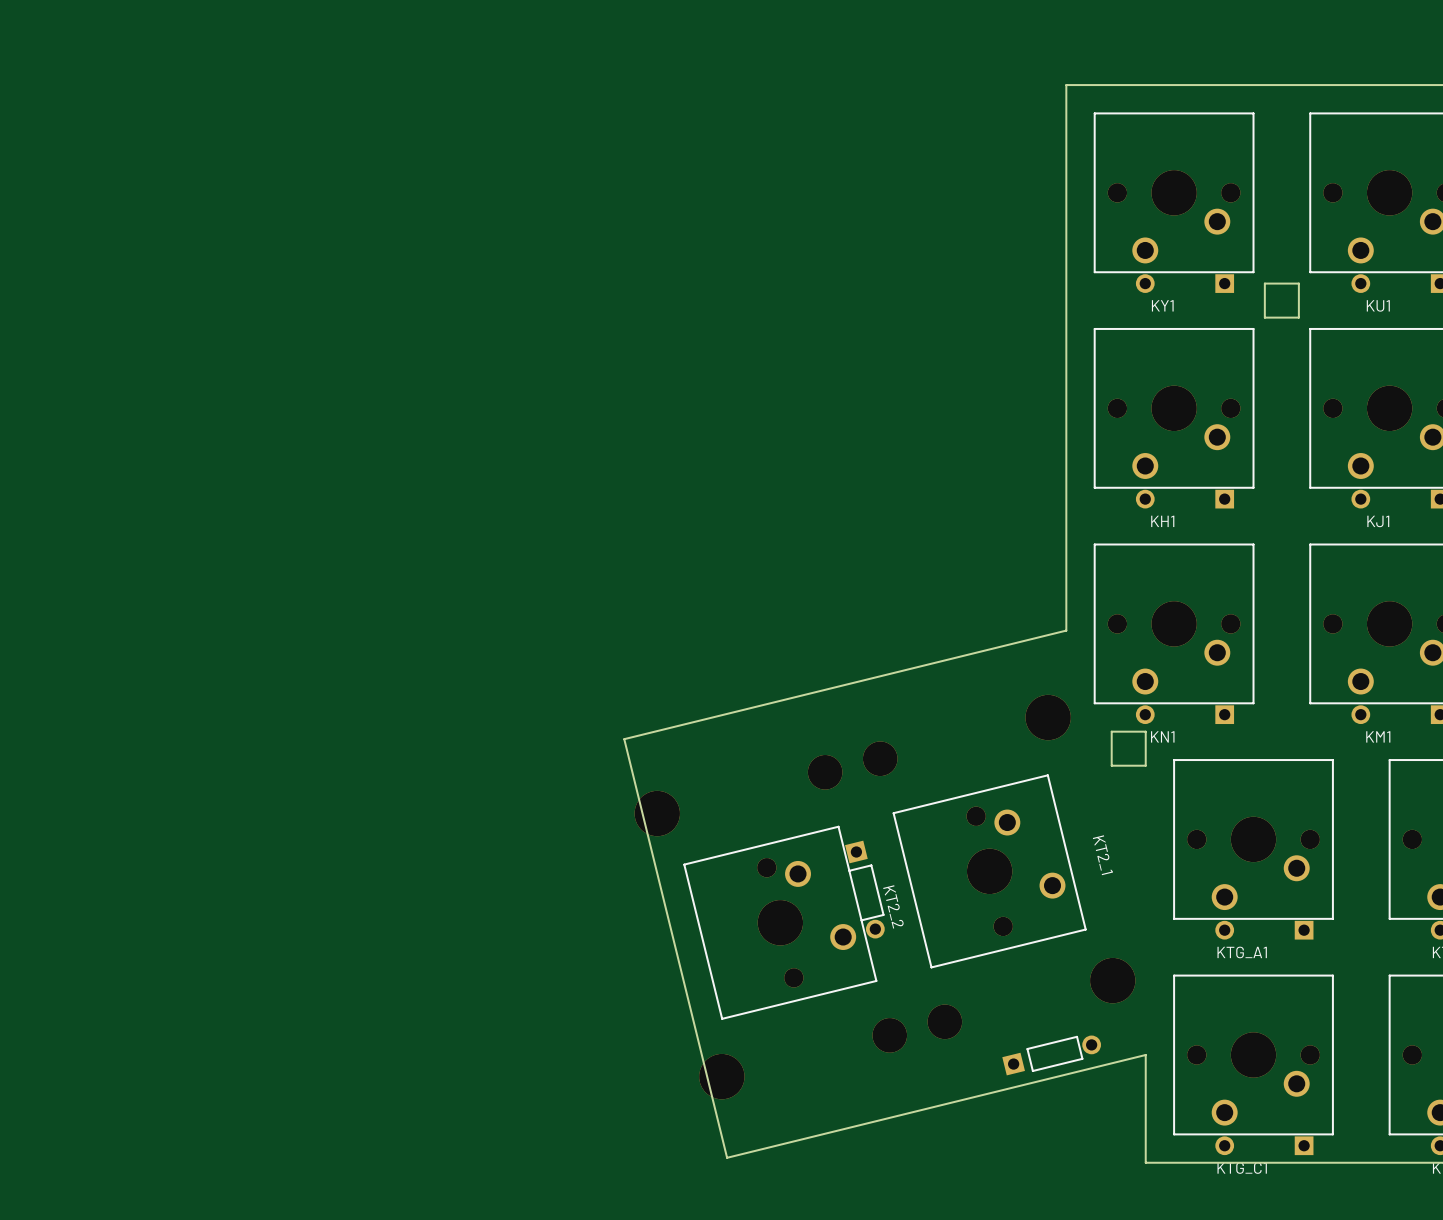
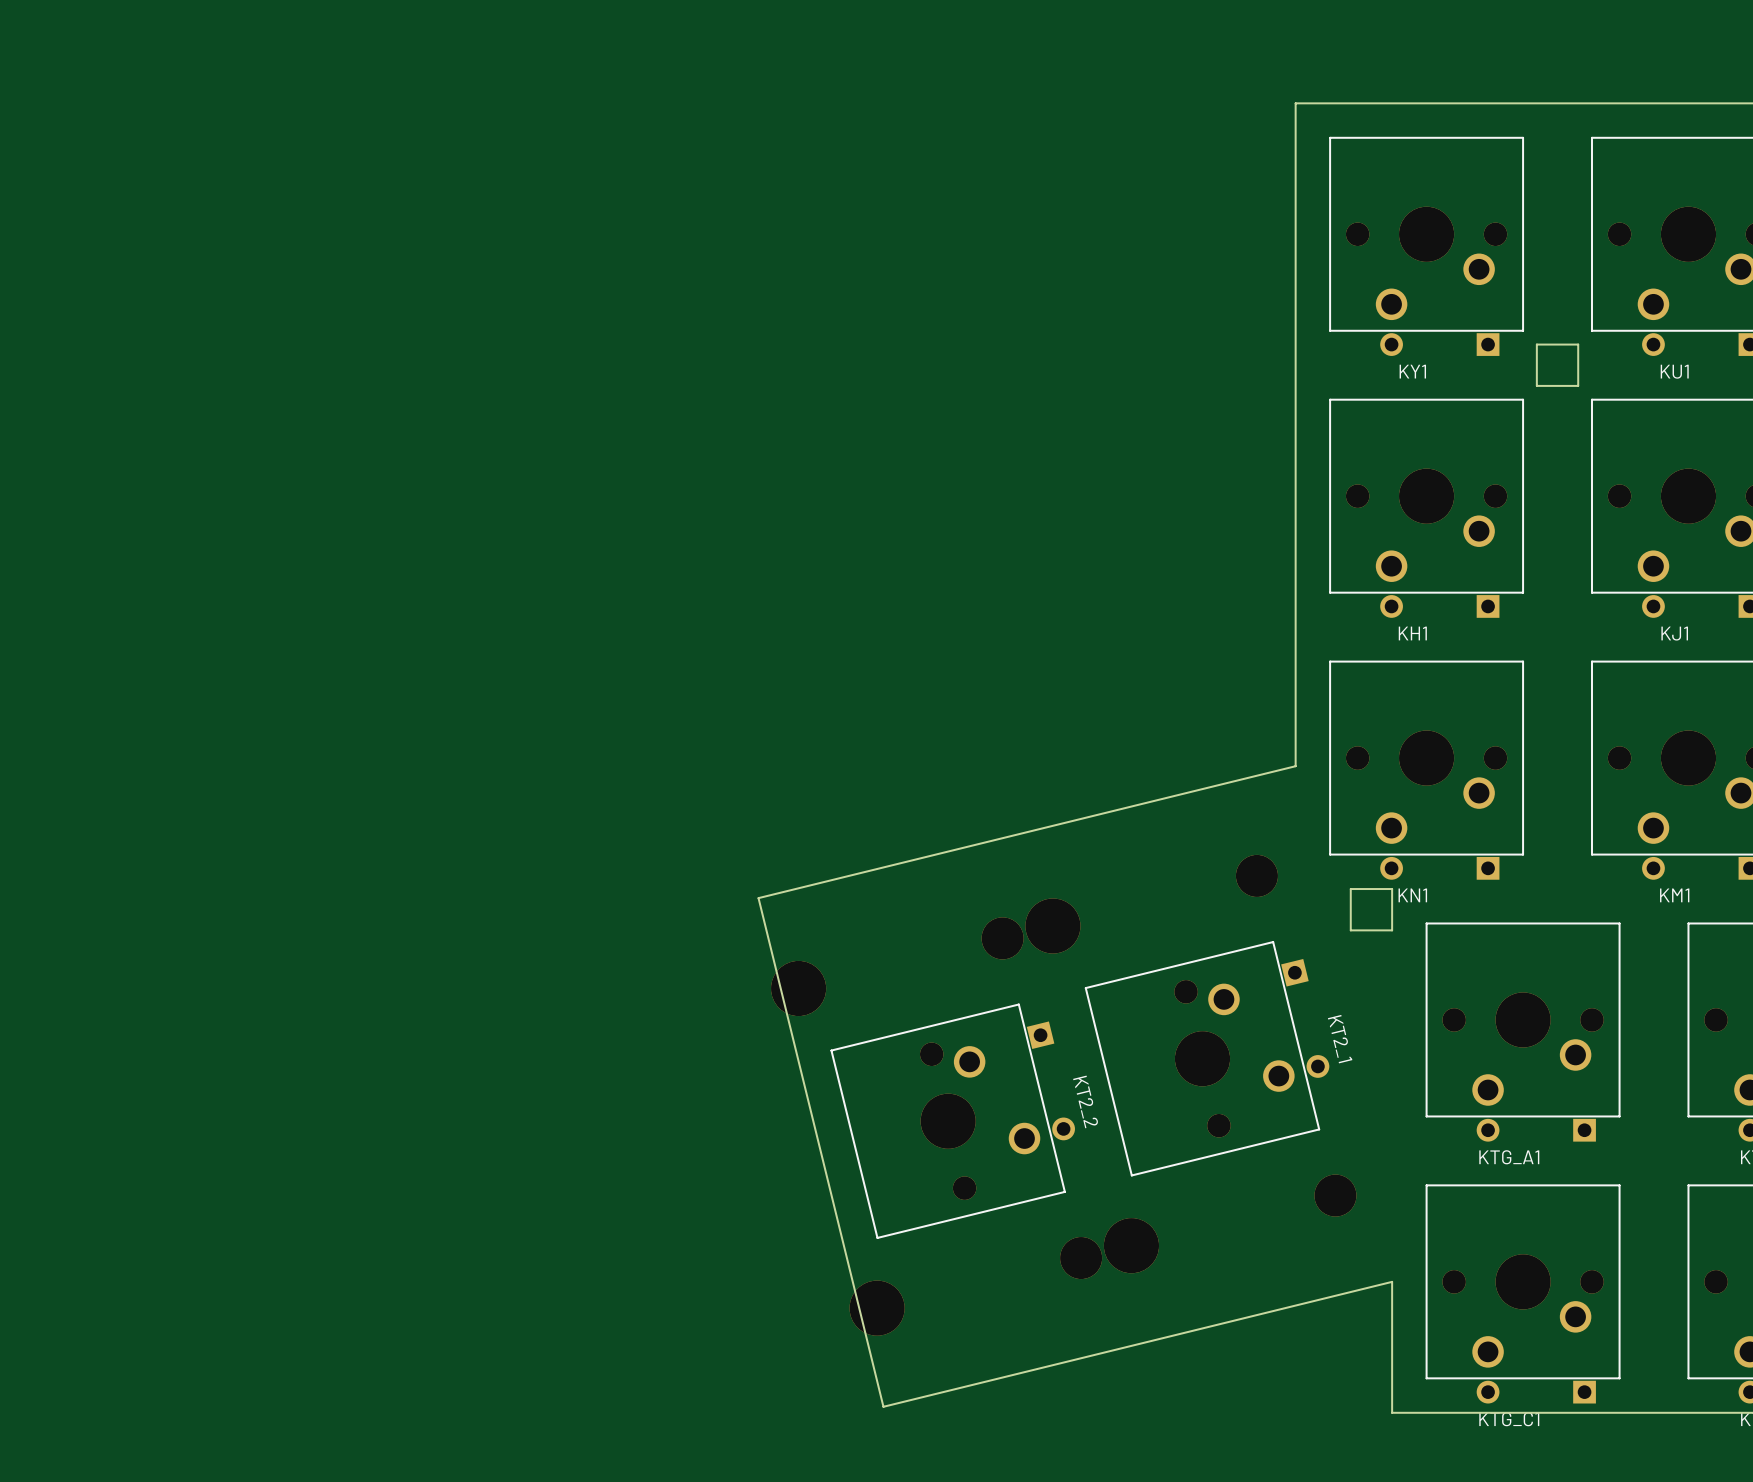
KT2_1 footprint: [862, 694, 1136, 1076] -> [1025, 854, 1357, 1274]
KT2_2 footprint: [634, 755, 908, 1100] -> [771, 917, 1103, 1336]

